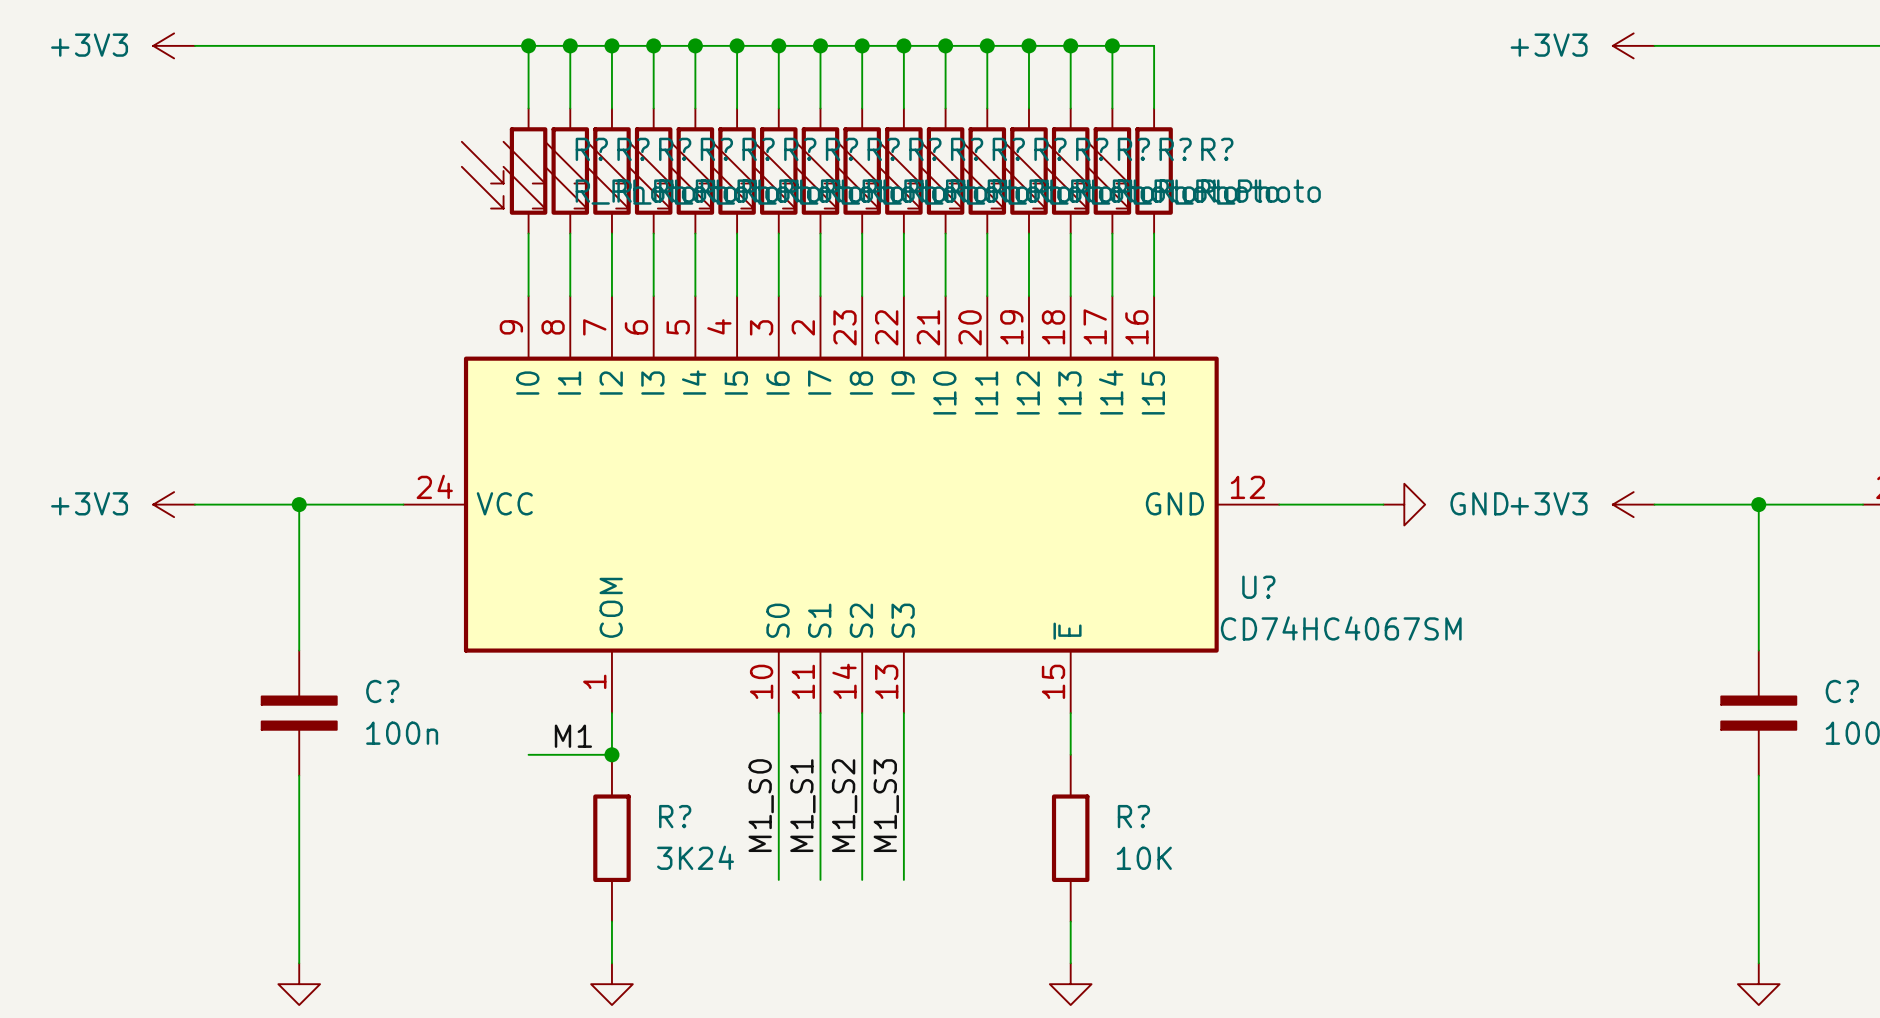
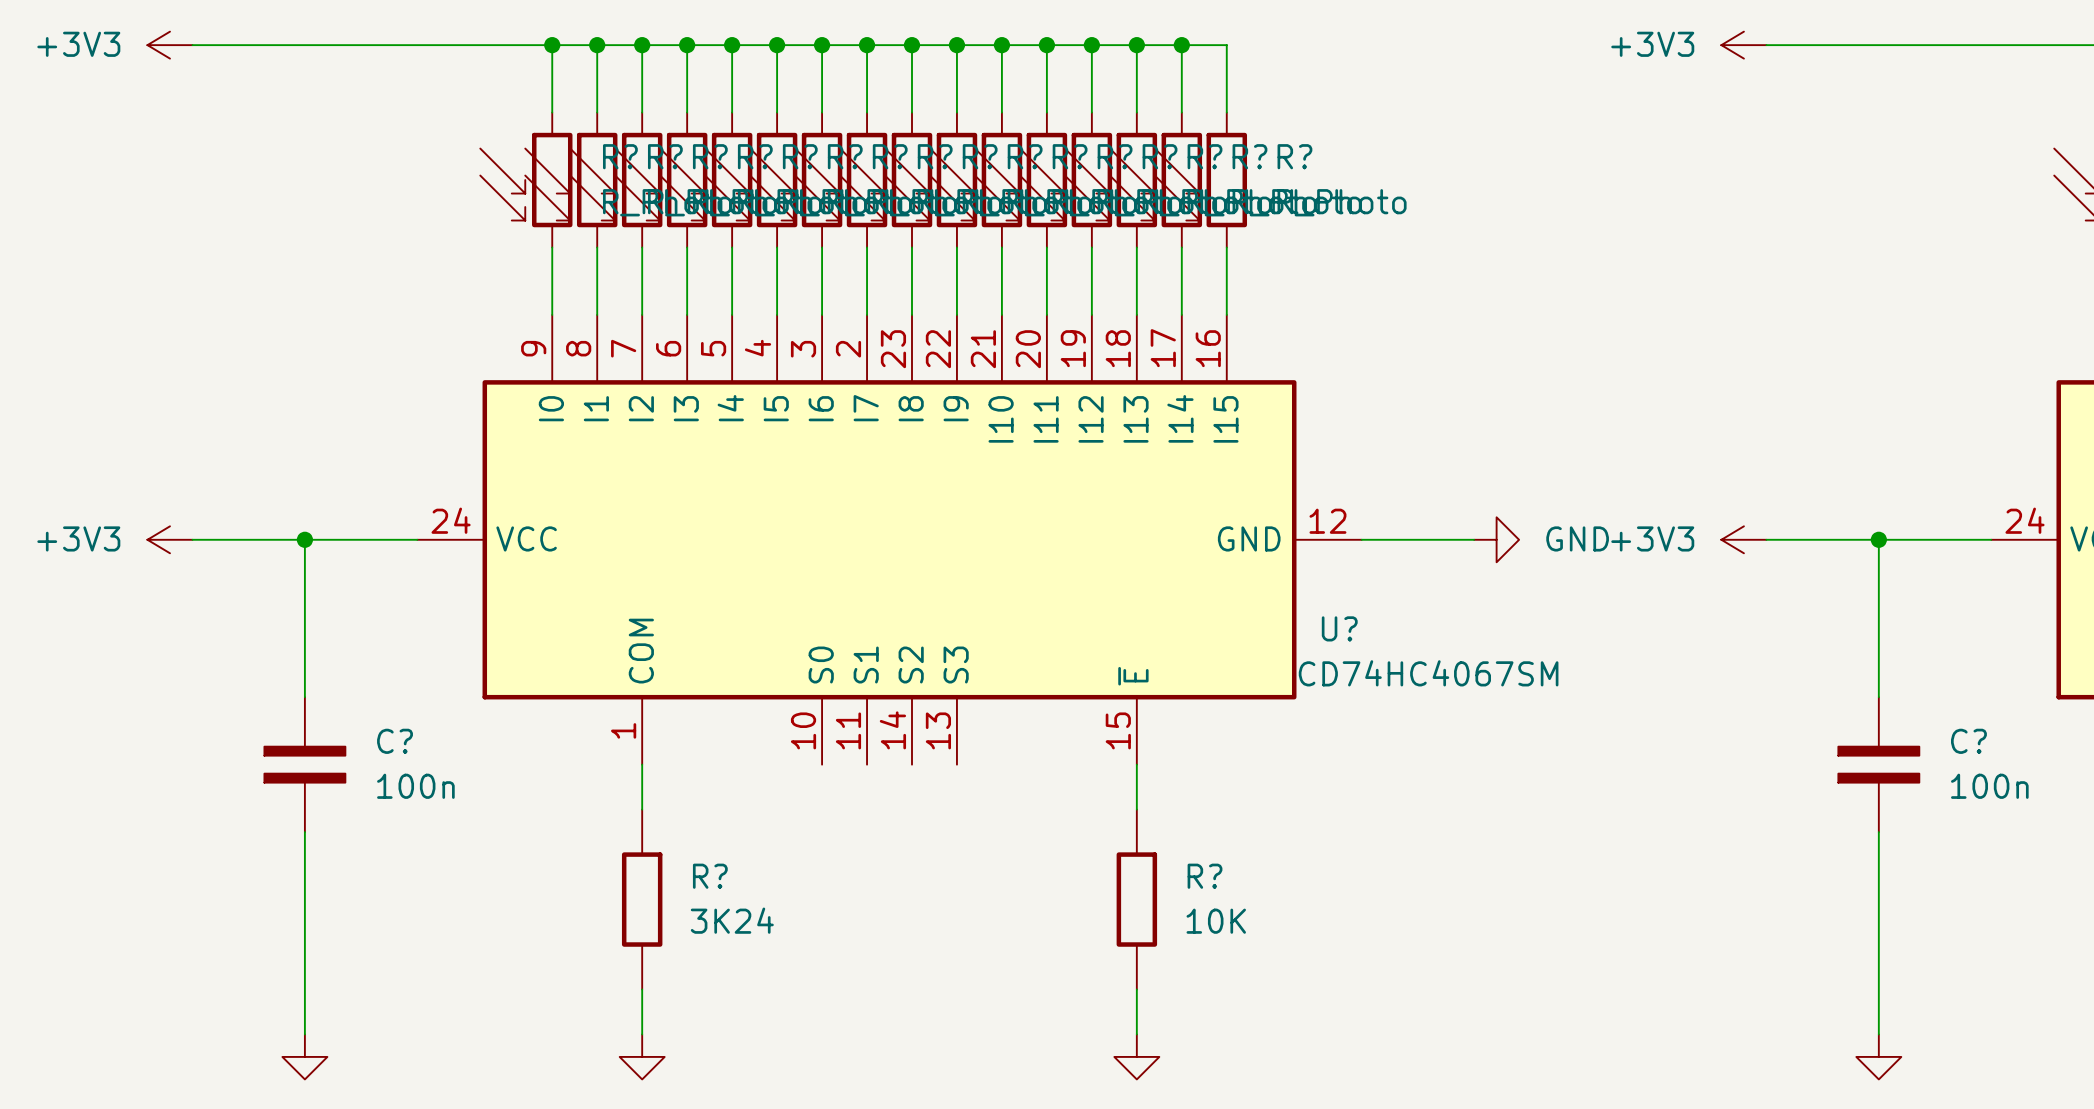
wire: (778, 713) (778, 879) -> none
wire: (820, 713) (820, 879) -> none
wire: (862, 713) (862, 879) -> none
wire: (903, 713) (903, 879) -> none
label: M1 (573, 736) -> none
wire: (528, 754) (611, 754) -> none
junction: (611, 754) -> none
label: M1_S0 (761, 805) -> none
label: M1_S1 (802, 805) -> none
label: M1_S2 (844, 805) -> none
label: M1_S3 (886, 805) -> none

